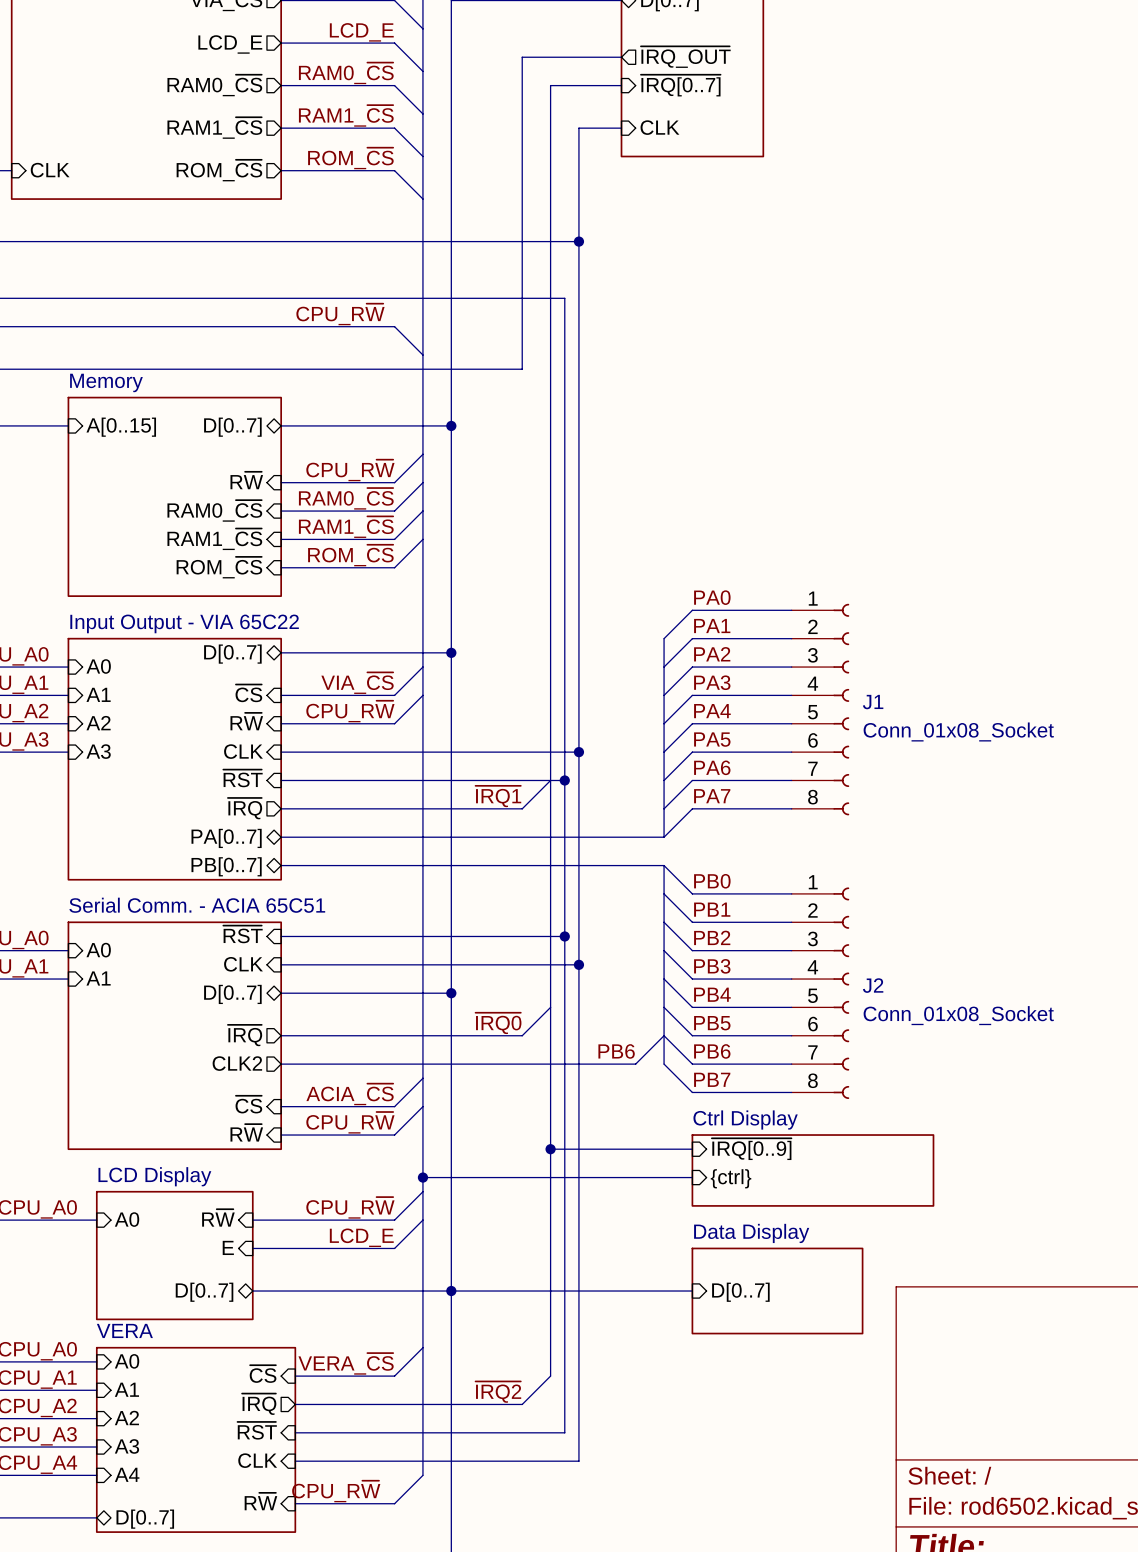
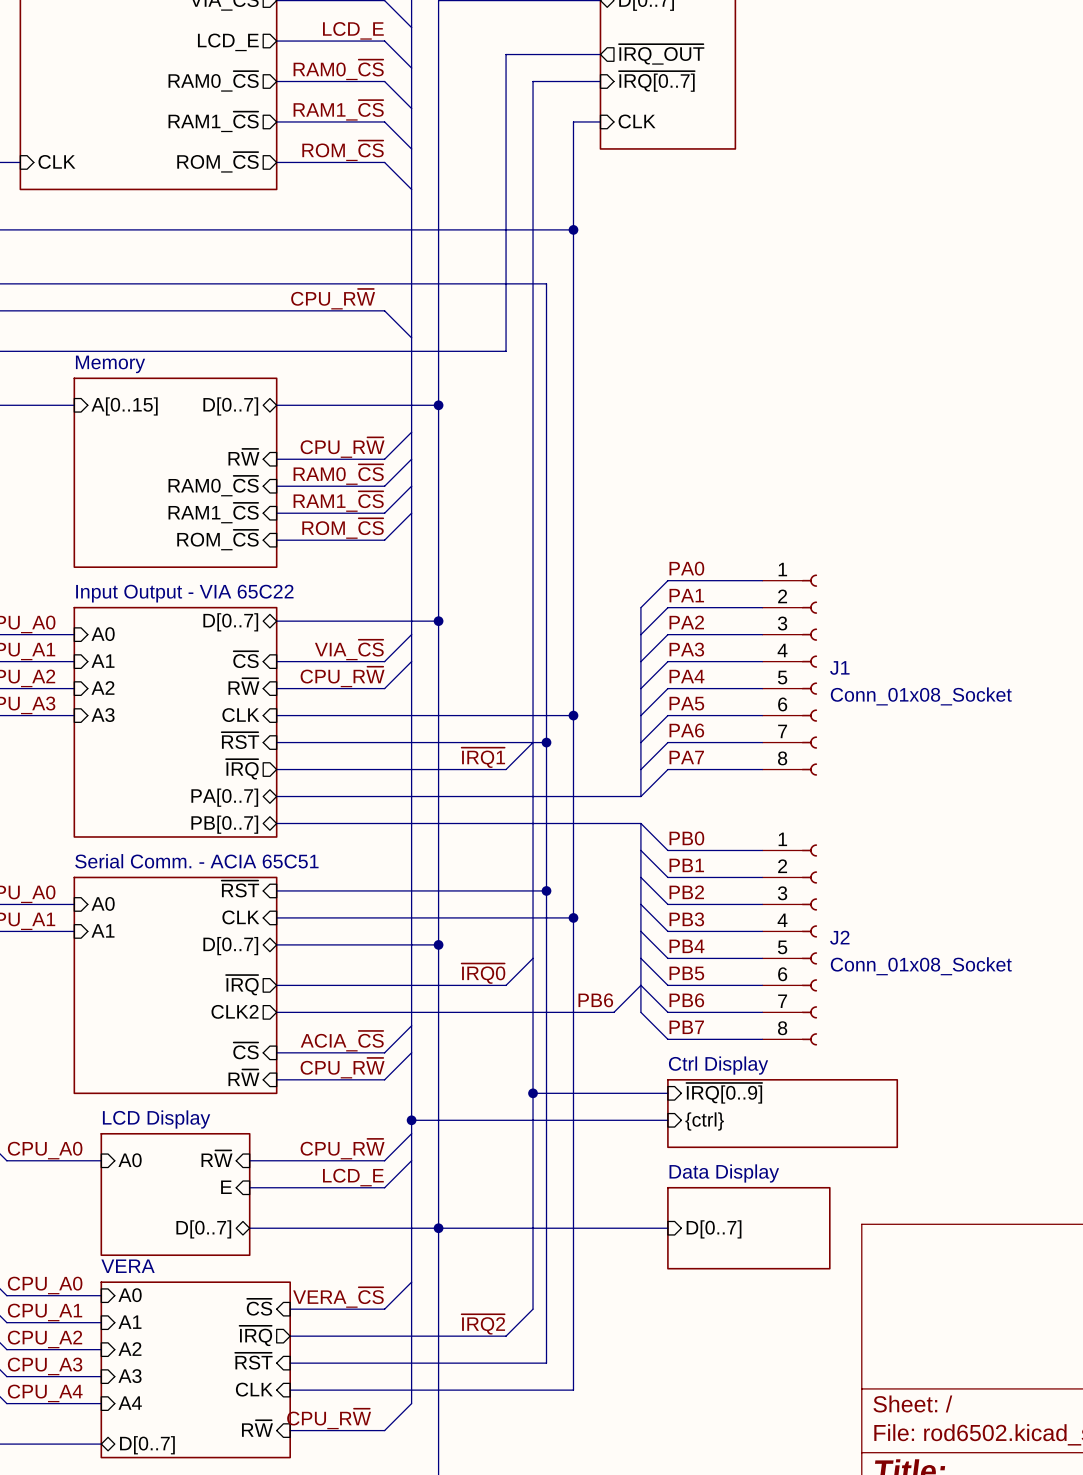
wire: (593, 128) (578, 128) (578, 1461) -> (573, 121) (573, 1390) (559, 1390)
wire: none -> (559, 229) (573, 229)
junction position: (578, 241) -> (573, 229)
wire: none -> (559, 715) (573, 715)
junction position: (578, 752) -> (573, 715)
wire: none -> (559, 917) (573, 917)
junction position: (578, 964) -> (573, 917)

